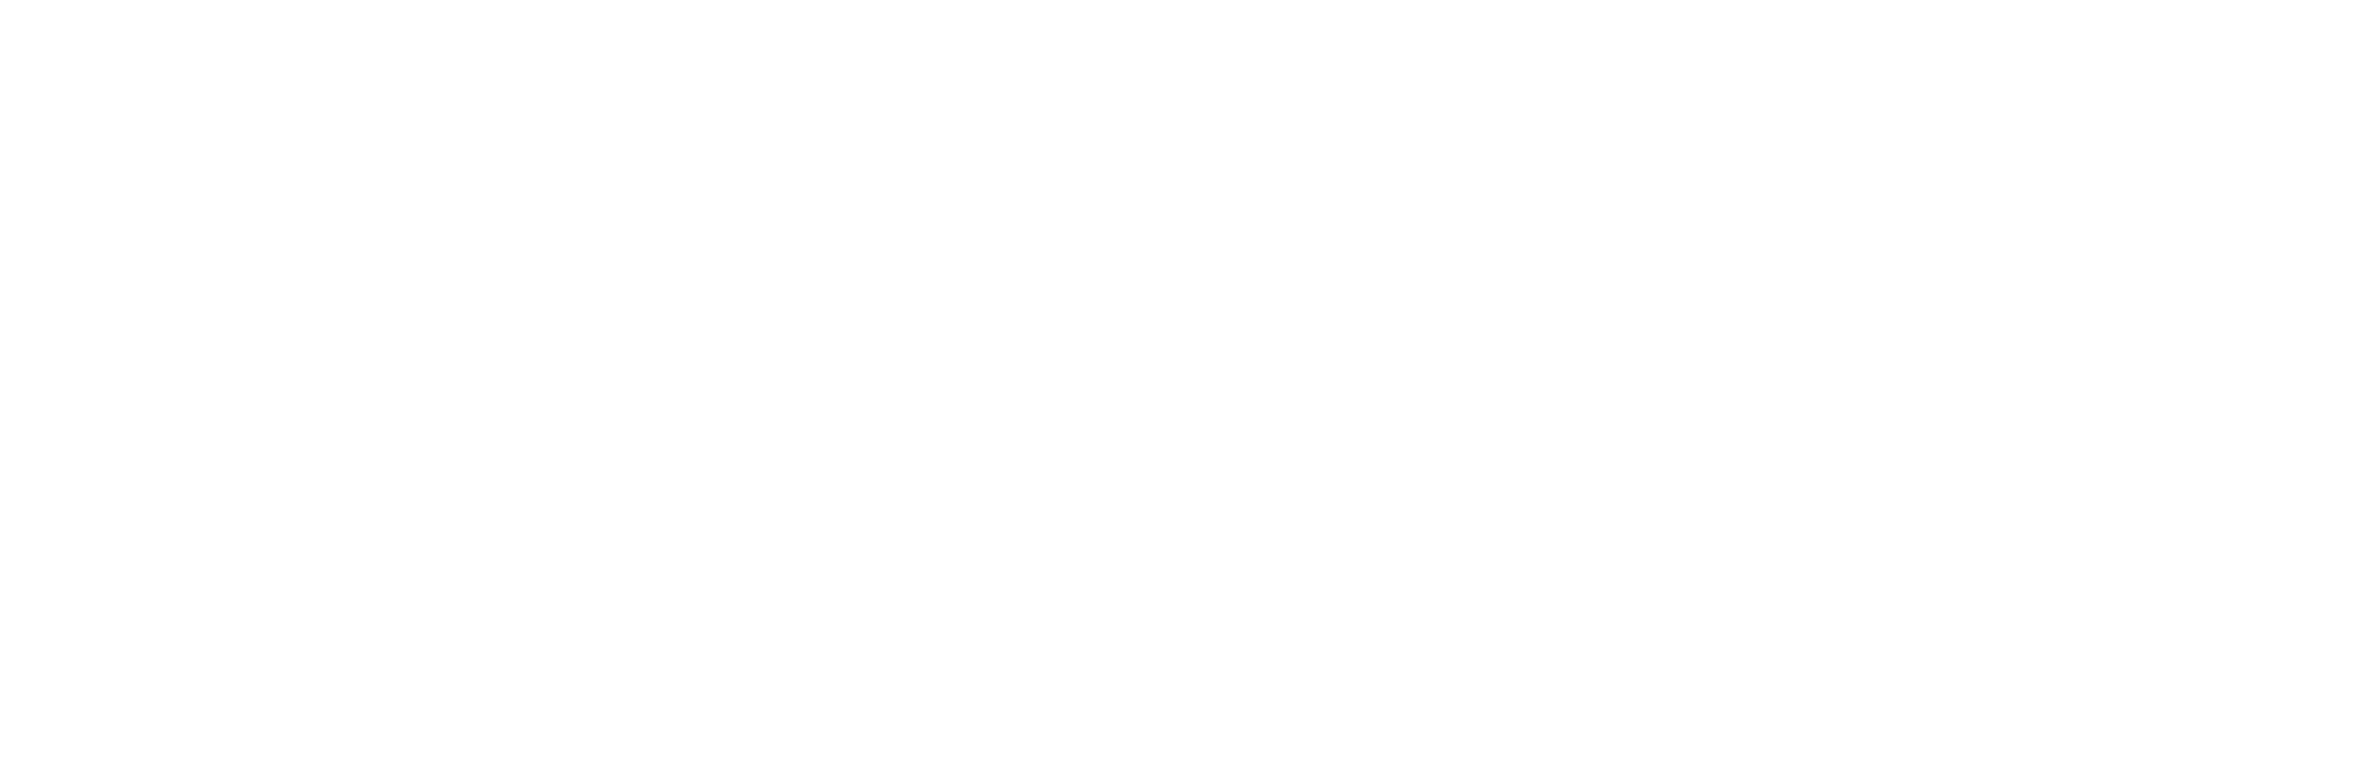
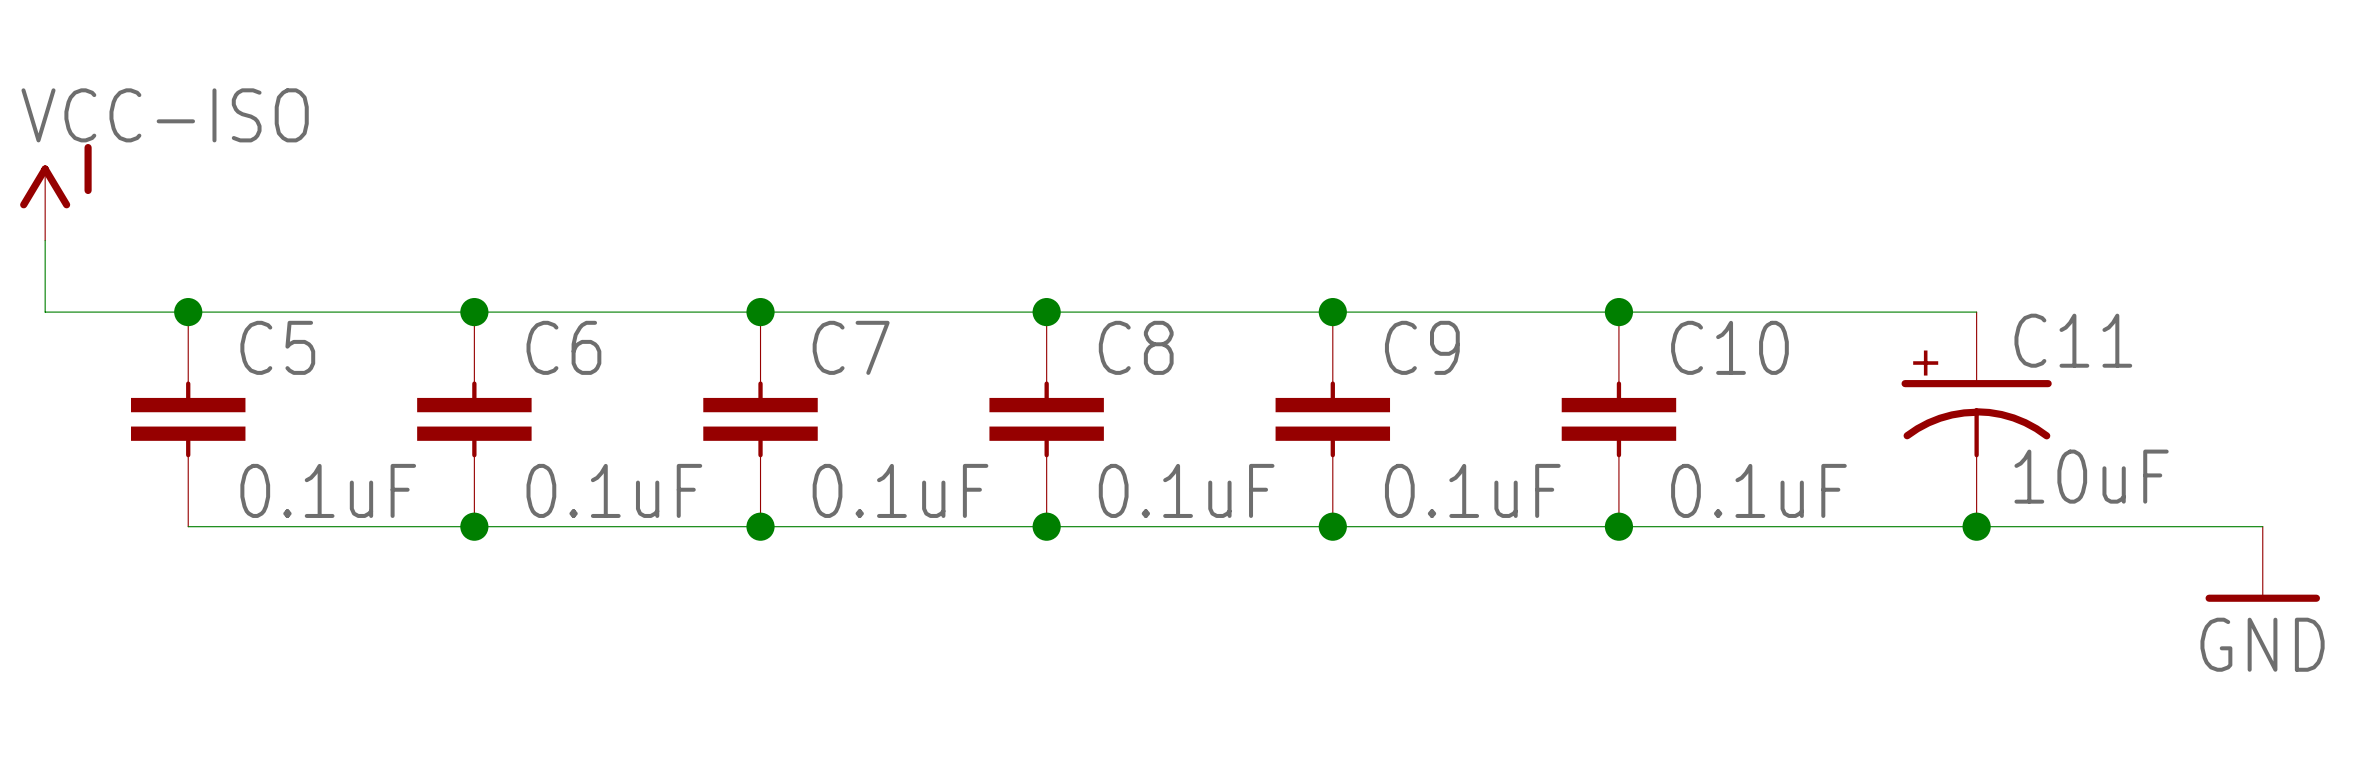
power symbol: none -> VCC-ISO (55, 192)
wire: none -> (45, 240) (45, 312) (1976, 312)
junction: none -> (188, 312)
junction: none -> (474, 312)
junction: none -> (760, 312)
junction: none -> (1046, 312)
junction: none -> (1332, 312)
junction: none -> (1618, 312)
C5: none -> 0.1uF (188, 419)
C6: none -> 0.1uF (474, 419)
C7: none -> 0.1uF (760, 419)
C8: none -> 0.1uF (1046, 419)
C9: none -> 0.1uF (1332, 419)
C10: none -> 0.1uF (1618, 419)
C11: none -> 10uF (1976, 419)
wire: none -> (188, 526) (2262, 526)
junction: none -> (474, 526)
junction: none -> (760, 526)
junction: none -> (1046, 526)
junction: none -> (1332, 526)
junction: none -> (1618, 526)
junction: none -> (1976, 526)
power symbol: none -> GND (2262, 564)

